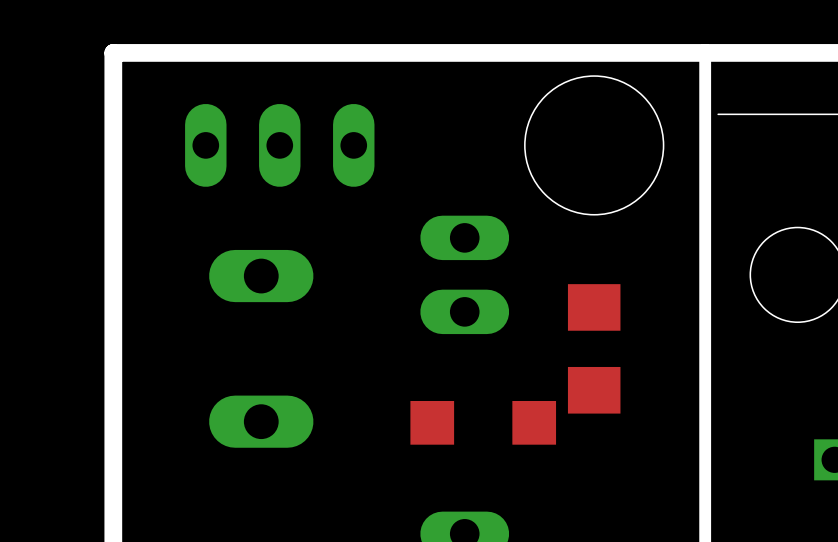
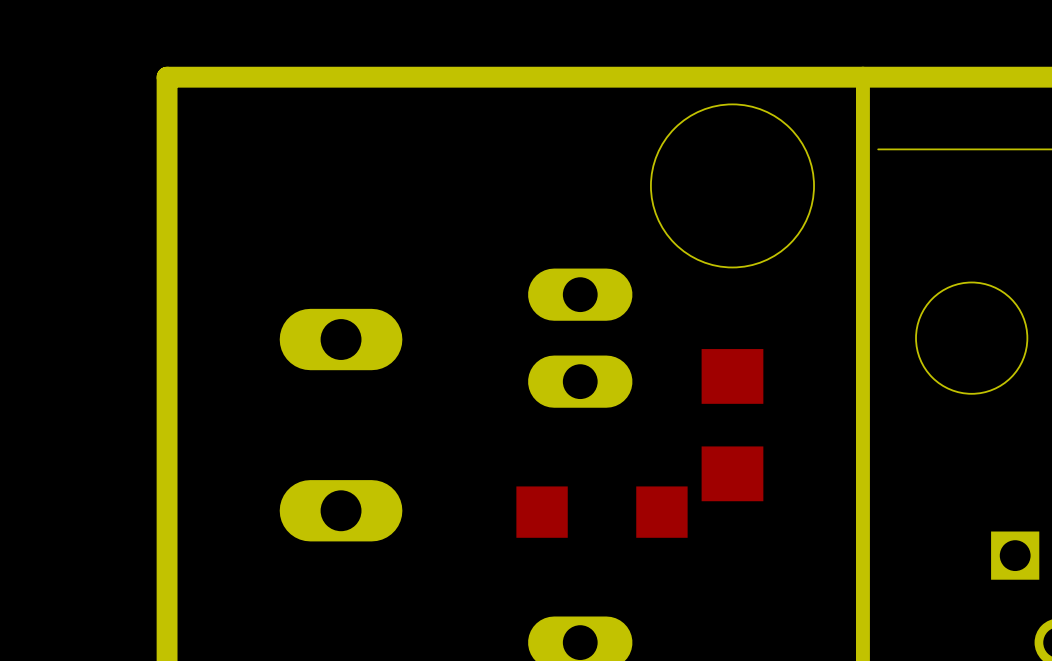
part: (279, 145) -> none

